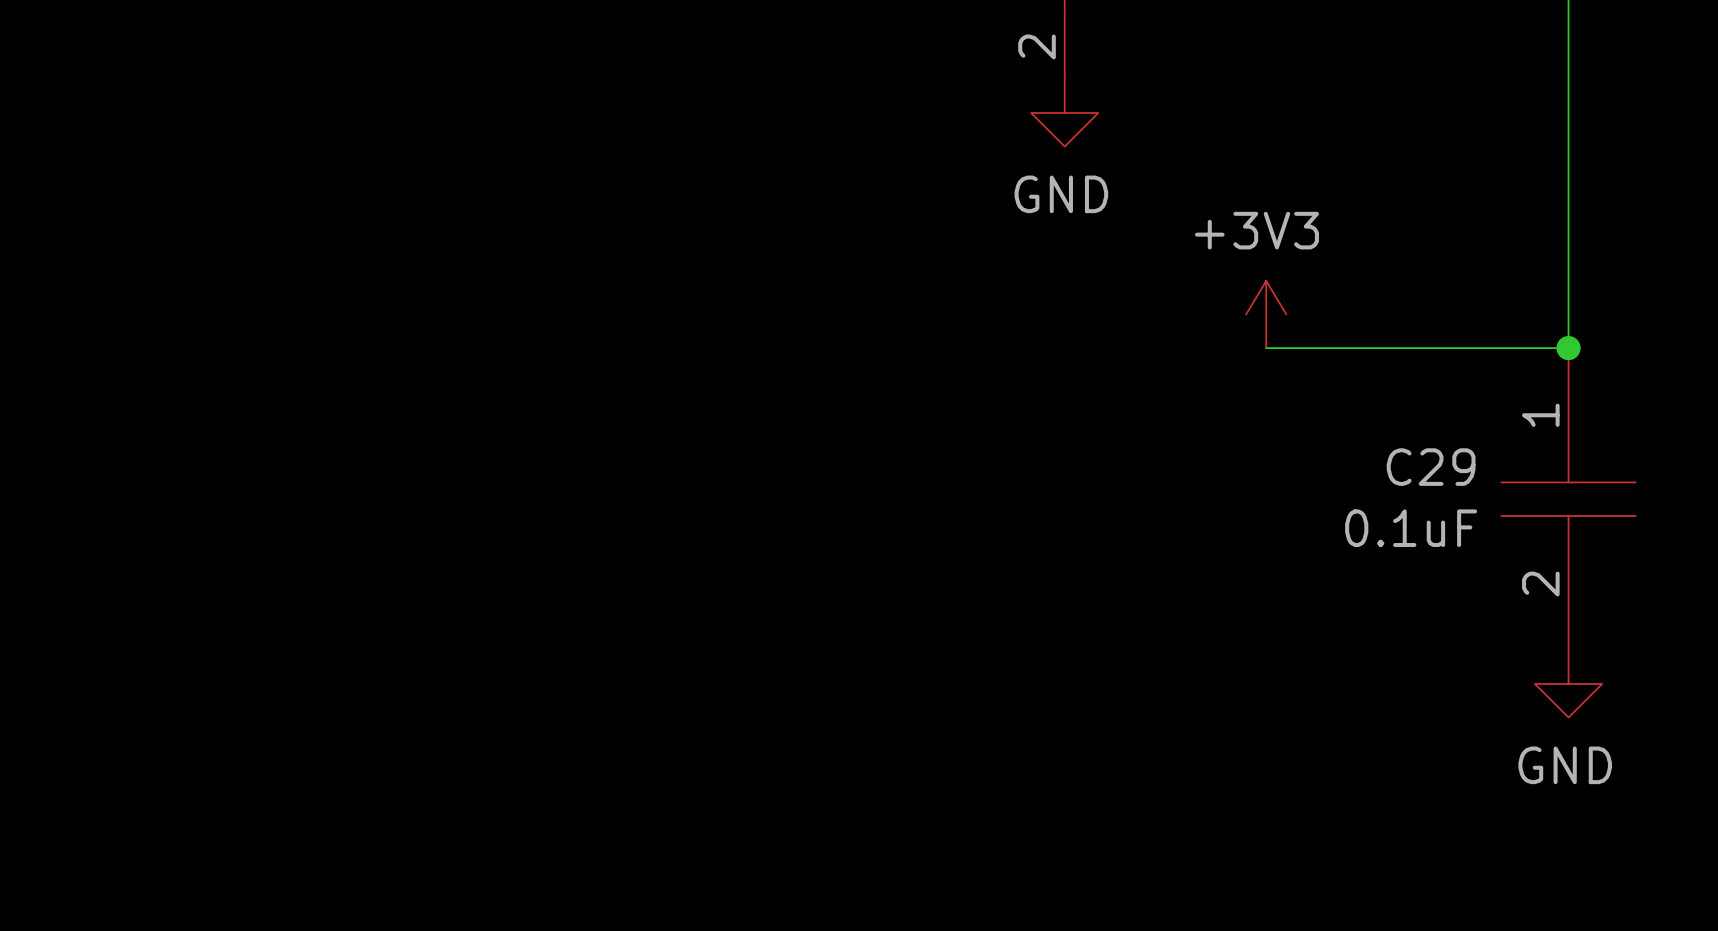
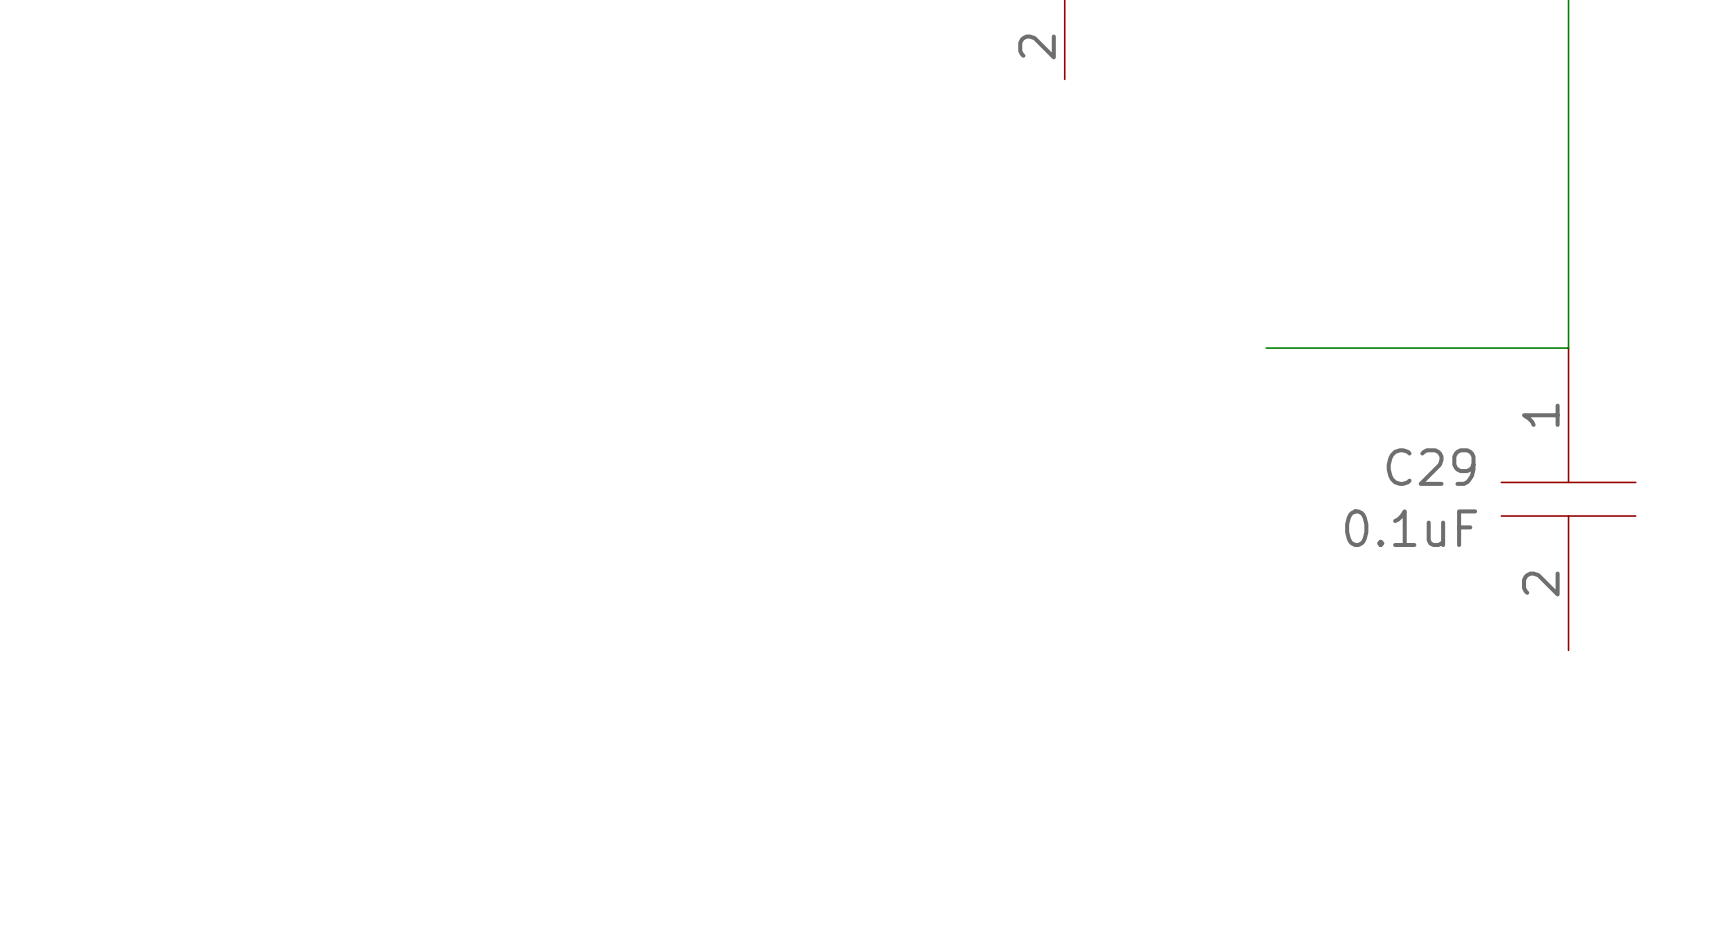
power symbol: GND (1064, 112) -> none
power symbol: +3V3 (1266, 314) -> none
junction: (1568, 348) -> none
power symbol: GND (1568, 683) -> none

